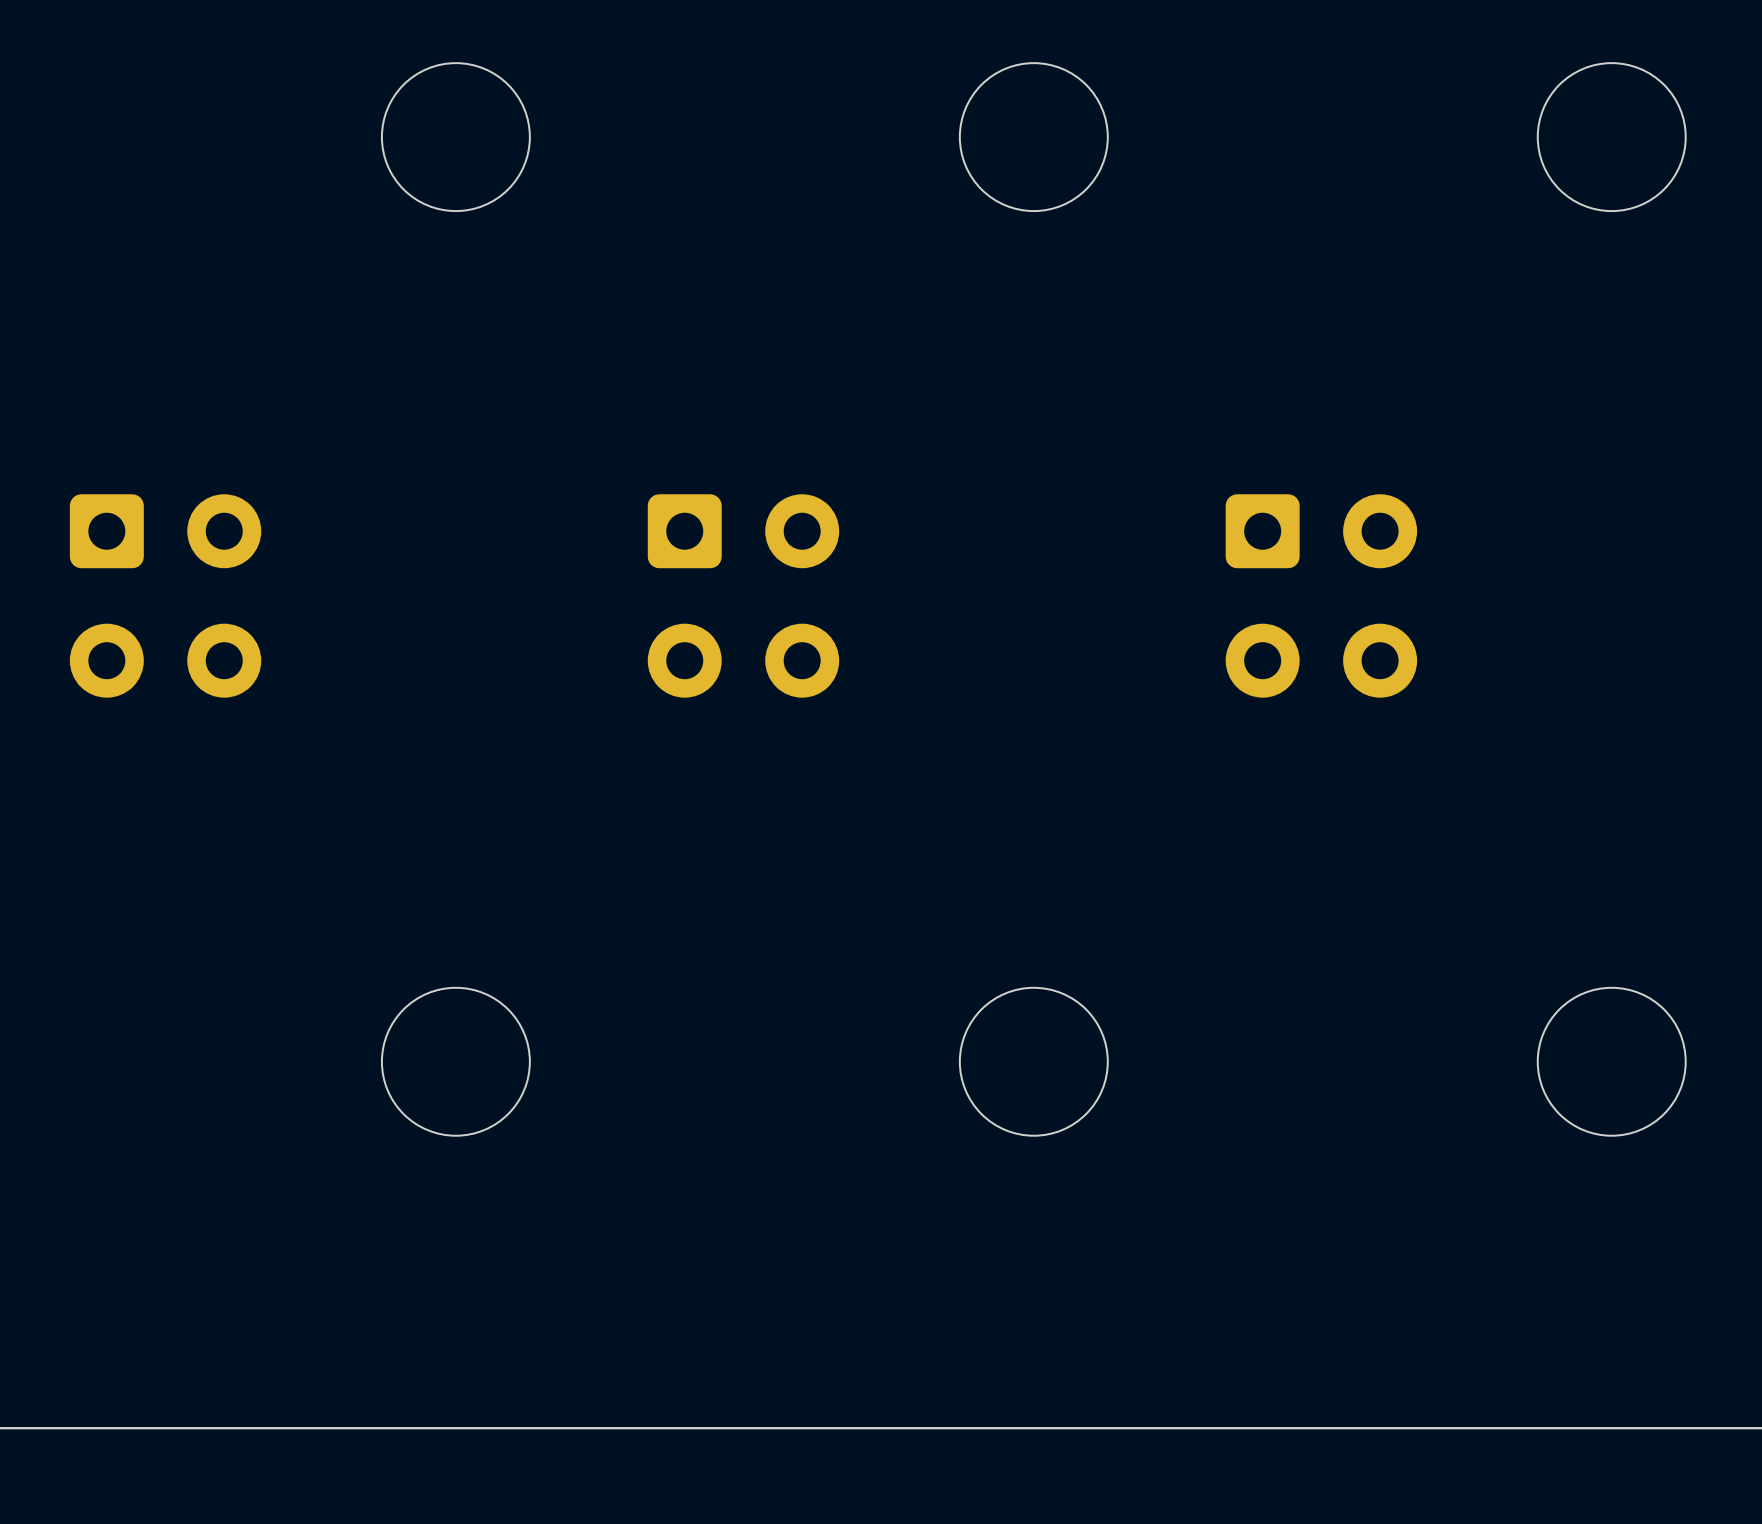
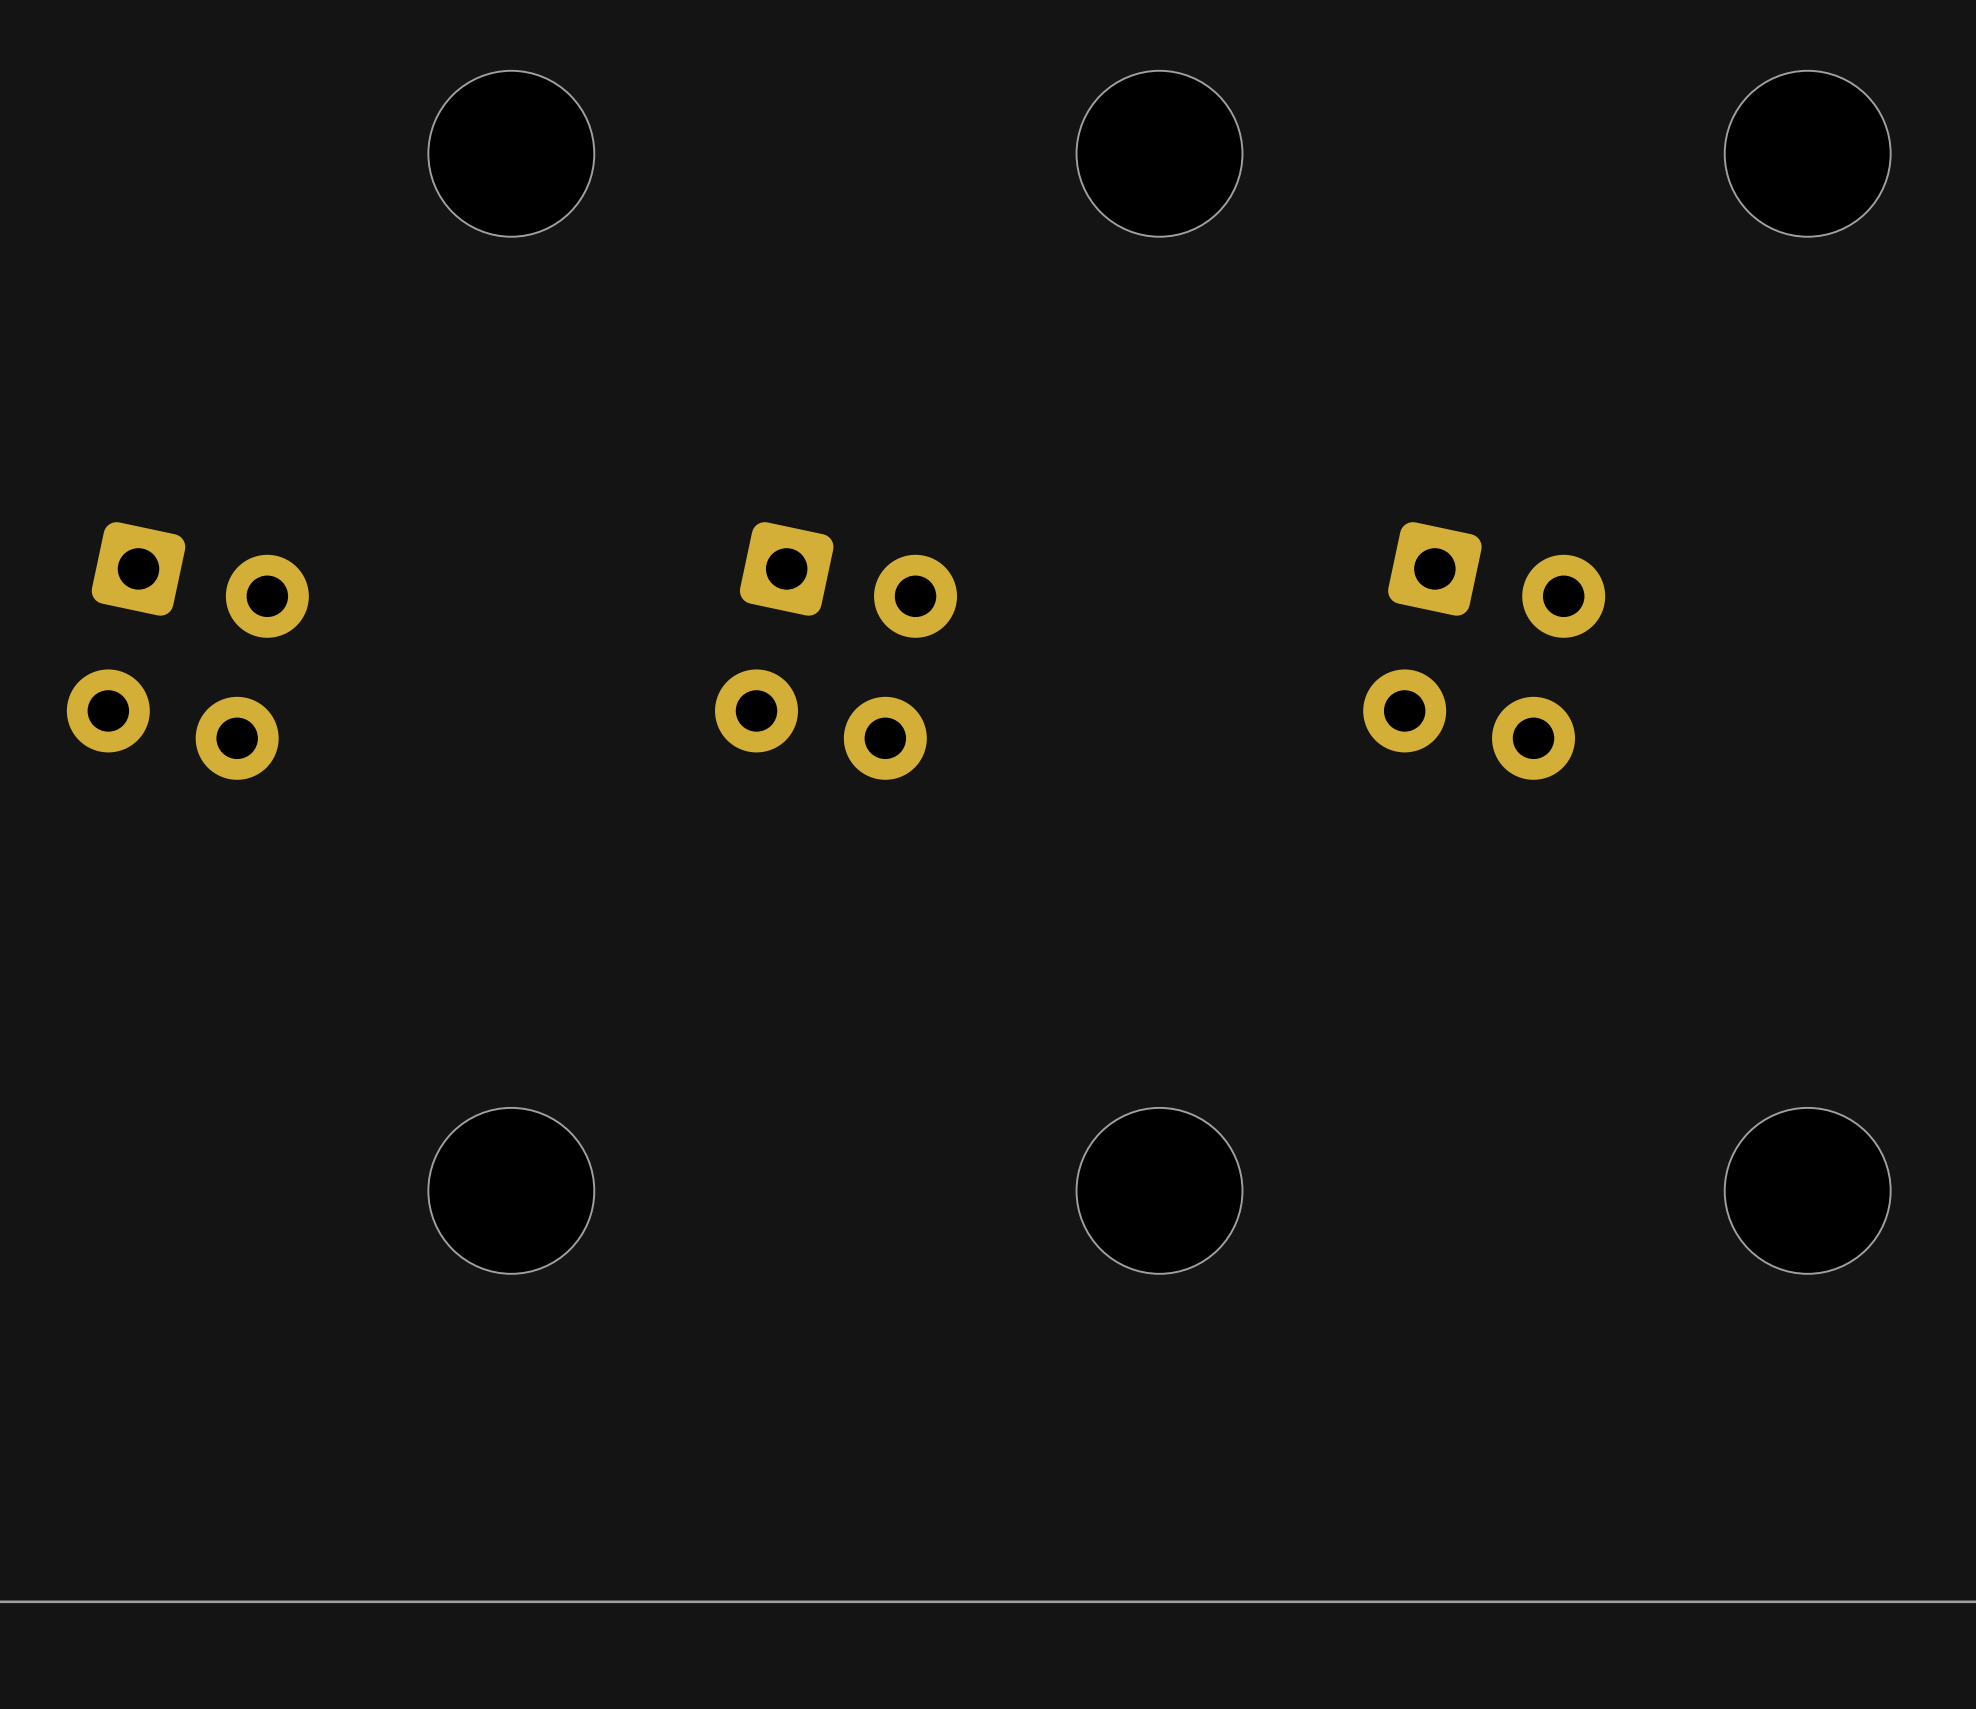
part footprint: [69, 494, 262, 698] -> [66, 522, 309, 780]
part footprint: [647, 494, 840, 698] -> [715, 522, 958, 780]
part footprint: [1225, 494, 1418, 698] -> [1363, 522, 1606, 780]

